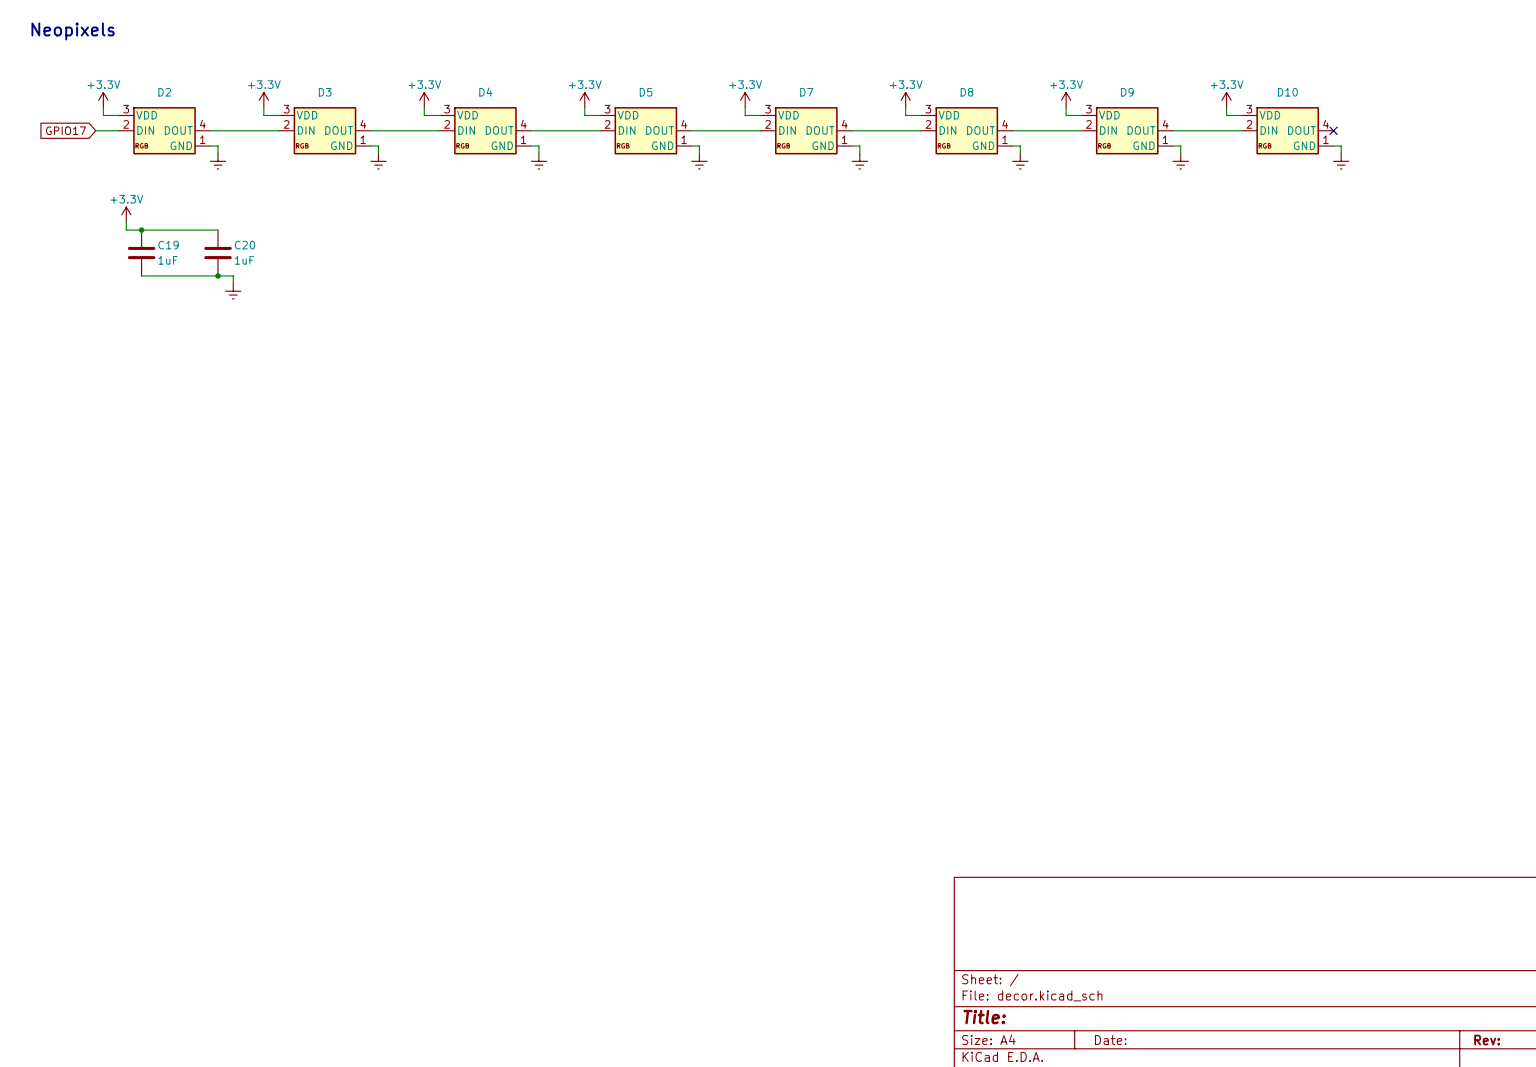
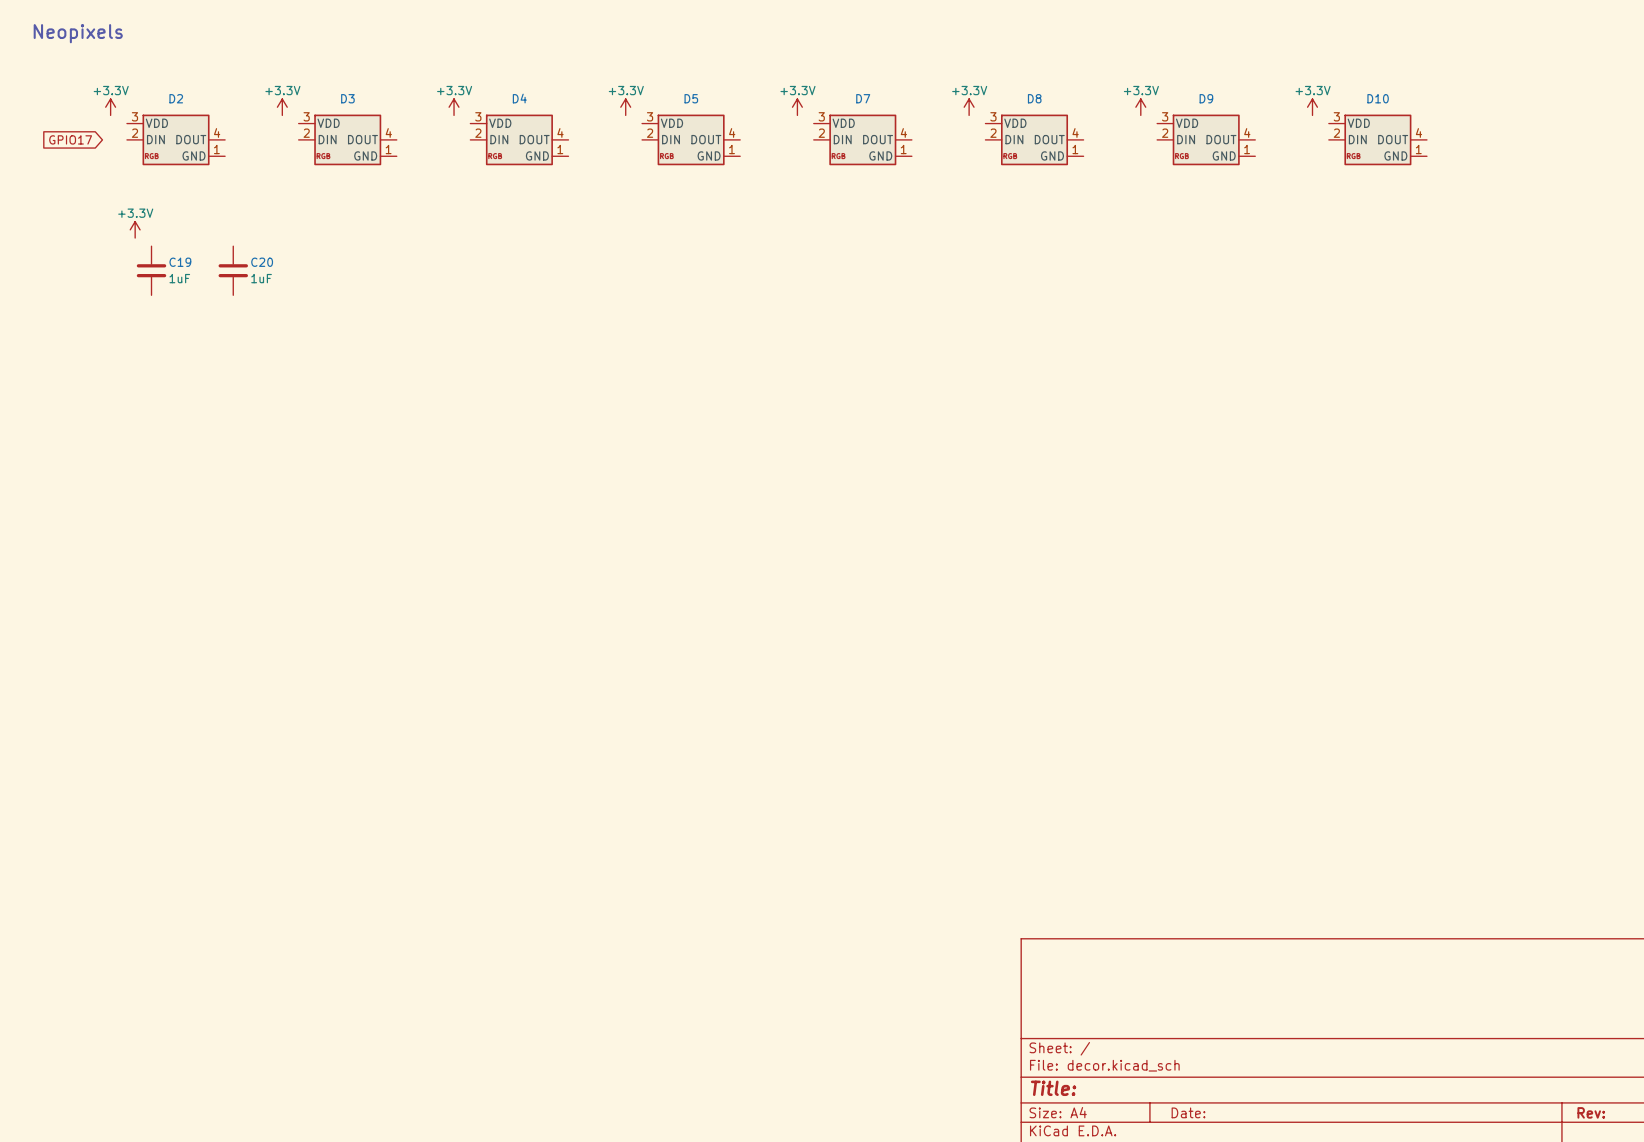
wire: (103, 107) (103, 115) (118, 115) -> none
wire: (263, 107) (263, 115) (279, 115) -> none
wire: (424, 107) (424, 115) (439, 115) -> none
wire: (584, 107) (584, 115) (600, 115) -> none
wire: (745, 107) (745, 115) (760, 115) -> none
wire: (905, 107) (905, 115) (920, 115) -> none
wire: (1066, 107) (1066, 115) (1081, 115) -> none
wire: (1226, 107) (1226, 115) (1241, 115) -> none
wire: (95, 130) (118, 130) -> none
wire: (210, 130) (279, 130) -> none
wire: (370, 130) (439, 130) -> none
wire: (531, 130) (600, 130) -> none
wire: (691, 130) (760, 130) -> none
wire: (852, 130) (920, 130) -> none
wire: (1012, 130) (1081, 130) -> none
wire: (1173, 130) (1241, 130) -> none
no-connect mark: (1333, 130) -> none
wire: (210, 146) (217, 146) (217, 153) -> none
wire: (370, 146) (378, 146) (378, 153) -> none
wire: (531, 146) (538, 146) (538, 153) -> none
wire: (691, 146) (699, 146) (699, 153) -> none
wire: (852, 146) (859, 146) (859, 153) -> none
wire: (1012, 146) (1020, 146) (1020, 153) -> none
wire: (1173, 146) (1180, 146) (1180, 153) -> none
wire: (1333, 146) (1341, 146) (1341, 153) -> none
power symbol: (217, 161) -> none
power symbol: (378, 161) -> none
power symbol: (538, 161) -> none
power symbol: (699, 161) -> none
power symbol: (859, 161) -> none
power symbol: (1020, 161) -> none
power symbol: (1180, 161) -> none
power symbol: (1341, 161) -> none
wire: (126, 222) (126, 230) (217, 230) -> none
junction: (141, 230) -> none
wire: (141, 275) (233, 275) (233, 283) -> none
junction: (217, 275) -> none
power symbol: (233, 291) -> none

